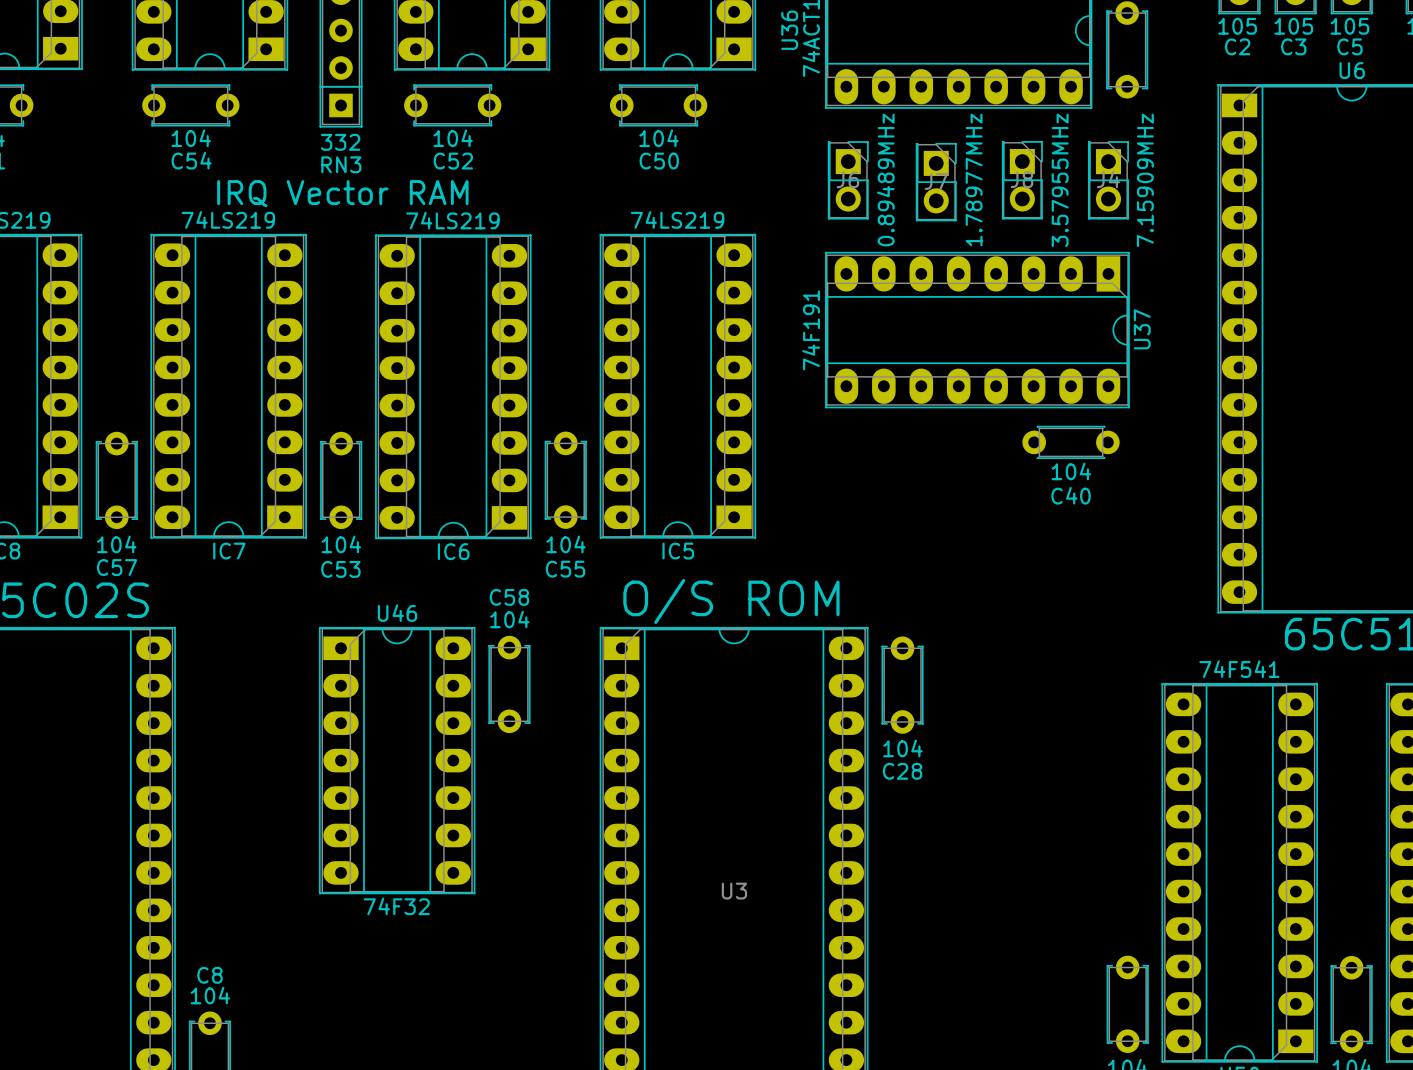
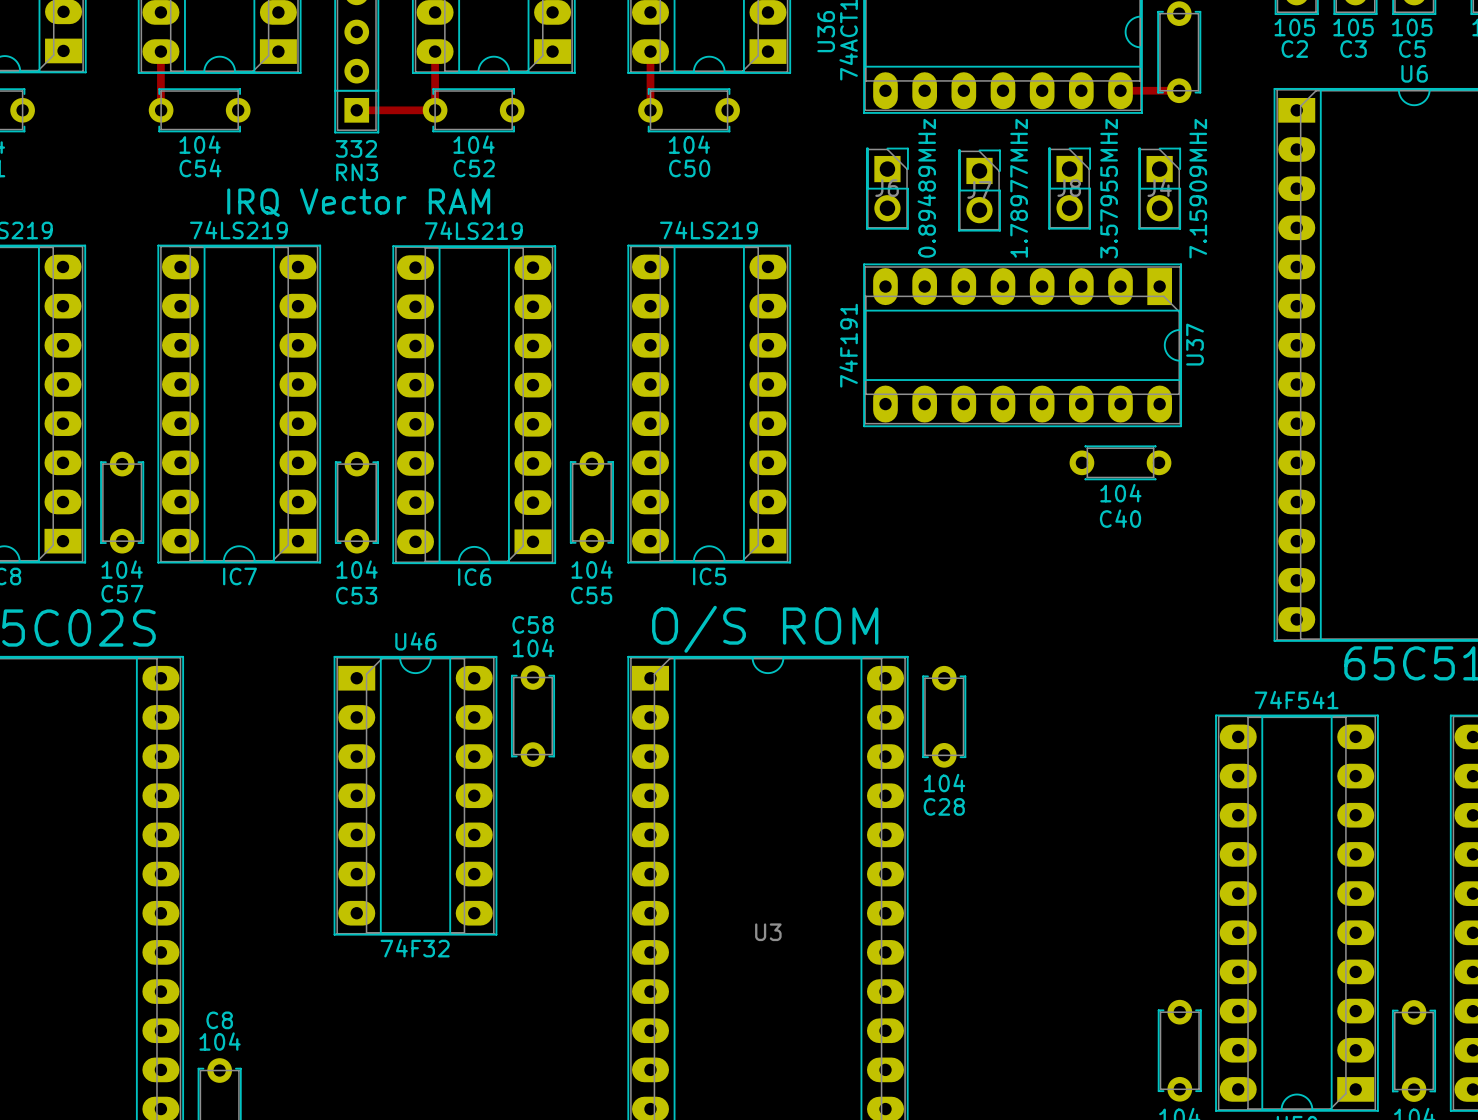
track: none -> (160, 51) (160, 110)
track: none -> (435, 51) (435, 110)
track: none -> (650, 51) (650, 110)
track: none -> (1120, 90) (1179, 90)
track: none -> (356, 110) (435, 110)

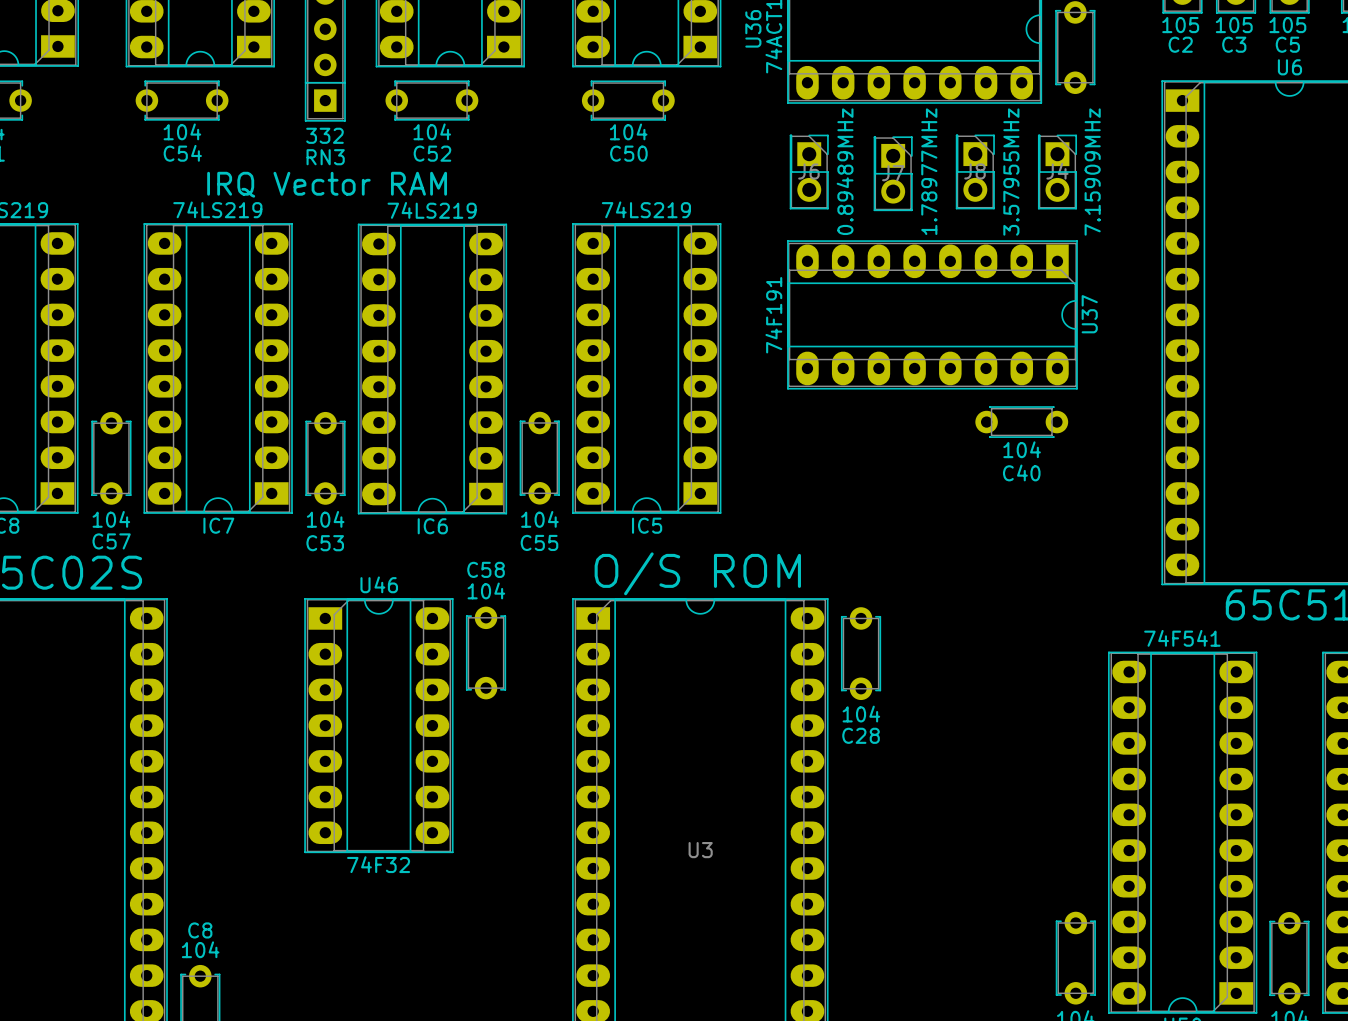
track: (160, 51) (160, 110) -> none
track: (435, 51) (435, 110) -> none
track: (650, 51) (650, 110) -> none
track: (1120, 90) (1179, 90) -> none
track: (356, 110) (435, 110) -> none

